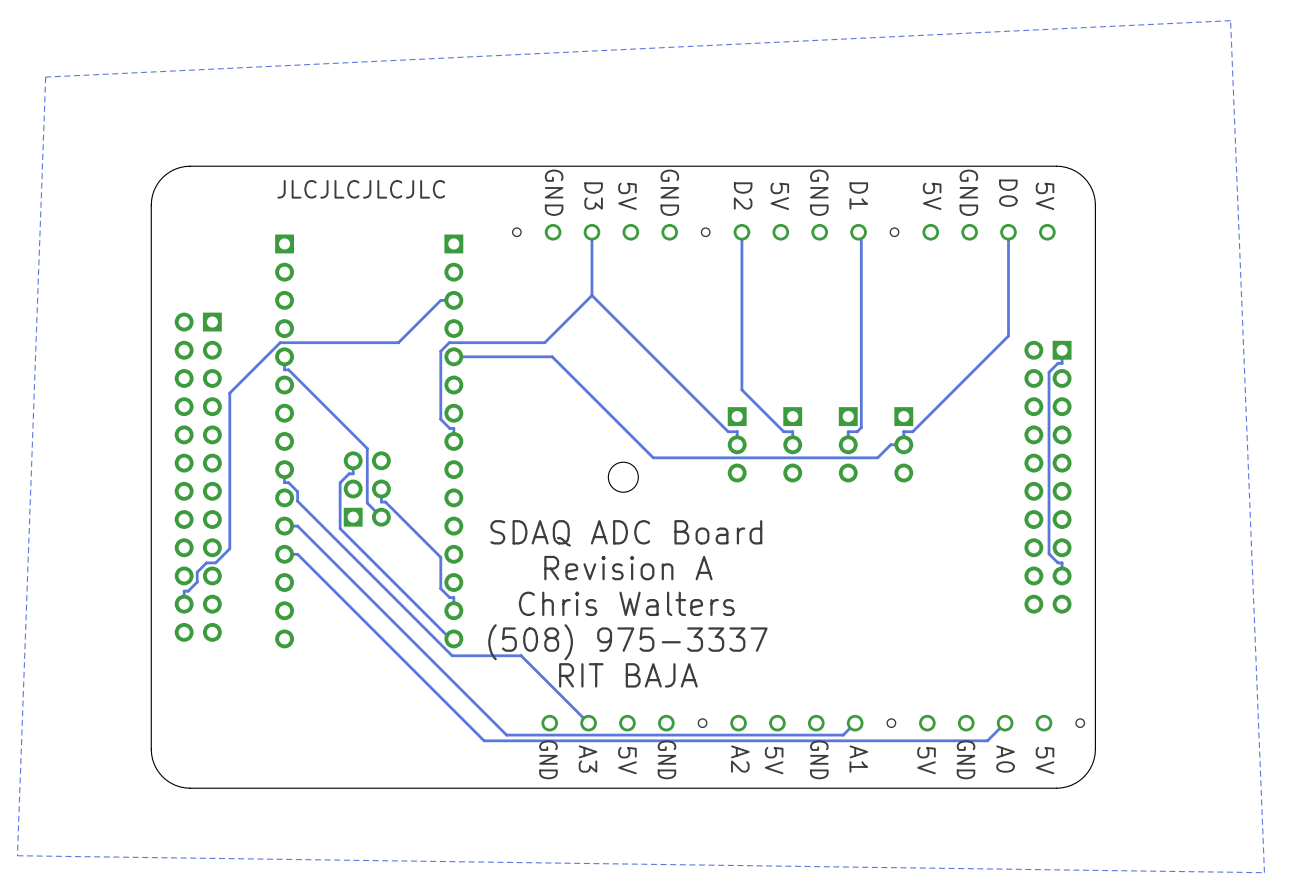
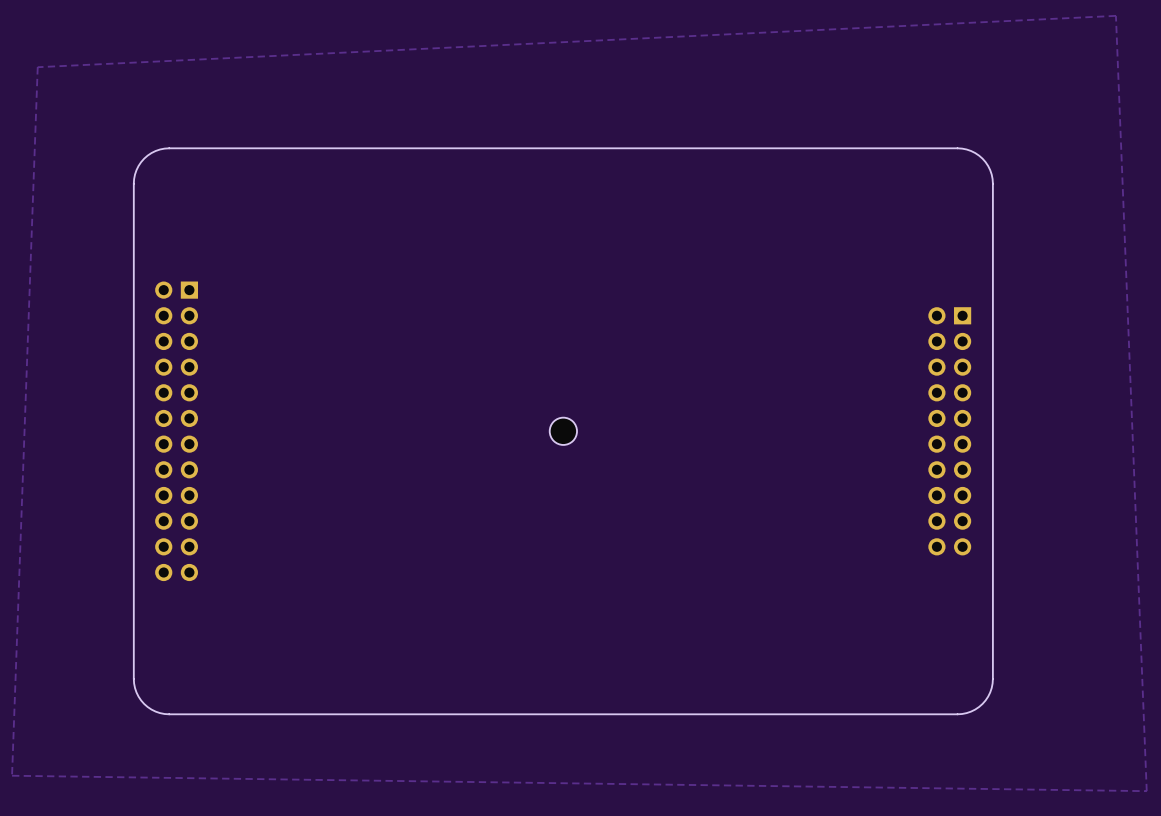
text: JLCJLCJLCJLC (361, 189) -> none
text: GND (554, 192) -> none
text: GND (669, 192) -> none
text: GND (819, 192) -> none
text: GND (968, 192) -> none
text: D0 (1008, 193) -> none
text: D3 (593, 195) -> none
text: D2 (743, 195) -> none
text: D1 (858, 195) -> none
text: 5V (627, 196) -> none
text: 5V (779, 196) -> none
text: 5V (932, 196) -> none
text: 5V (1045, 196) -> none
track: (591, 232) (591, 295) -> none
part: (595, 232) -> none
track: (741, 232) (741, 389) (783, 431) (792, 431) (792, 444) -> none
part: (783, 232) -> none
track: (858, 232) (861, 235) (861, 427) (857, 431) (848, 431) (848, 444) -> none
part: (972, 232) -> none
track: (1008, 232) (1008, 336) (912, 431) (903, 431) (903, 444) (890, 444) (877, 457) (653, 457) (552, 356) (453, 356) -> none
track: (591, 295) (728, 431) (737, 431) (737, 444) -> none
track: (591, 295) (544, 342) (449, 342) (440, 351) (440, 419) (449, 428) (453, 428) (453, 441) -> none
track: (453, 300) (440, 300) (398, 342) (280, 342) (229, 393) (229, 548) (215, 562) (206, 562) (197, 572) (197, 582) (188, 591) (184, 591) (184, 604) -> none
track: (1062, 350) (1062, 363) (1058, 363) (1049, 372) (1049, 553) (1058, 562) (1062, 562) (1062, 575) -> none
track: (284, 356) (284, 369) (288, 369) (367, 448) (367, 503) (381, 517) -> none
part: (284, 441) -> none
part: (453, 441) -> none
part: (737, 444) -> none
part: (792, 444) -> none
part: (848, 444) -> none
part: (903, 444) -> none
track: (353, 460) (353, 473) (349, 473) (340, 482) (340, 528) (450, 638) (453, 638) -> none
track: (284, 469) (284, 482) (288, 482) (297, 491) (297, 501) (452, 655) (521, 655) (588, 723) -> none
part: (367, 488) -> none
track: (381, 488) (381, 502) (385, 502) (440, 557) (440, 588) (449, 597) (453, 597) (453, 610) -> none
track: (284, 526) (297, 526) (506, 735) (843, 735) (855, 723) -> none
text: SDAQ ADC Board (626, 533) -> none
track: (284, 554) (297, 554) (484, 740) (987, 740) (1005, 723) -> none
text: Revision A (628, 568) -> none
text: Chris Walters (626, 603) -> none
text: (508) 975-3337 (627, 642) -> none
text: RIT BAJA (628, 675) -> none
part: (624, 723) -> none
part: (813, 723) -> none
part: (1002, 723) -> none
text: GND (548, 759) -> none
text: A3 (587, 759) -> none
text: GND (666, 759) -> none
text: A2 (740, 759) -> none
text: GND (819, 759) -> none
text: A1 (858, 759) -> none
text: GND (966, 759) -> none
text: A0 (1005, 759) -> none
text: 5V (627, 760) -> none
text: 5V (774, 760) -> none
text: 5V (926, 760) -> none
text: 5V (1045, 760) -> none

